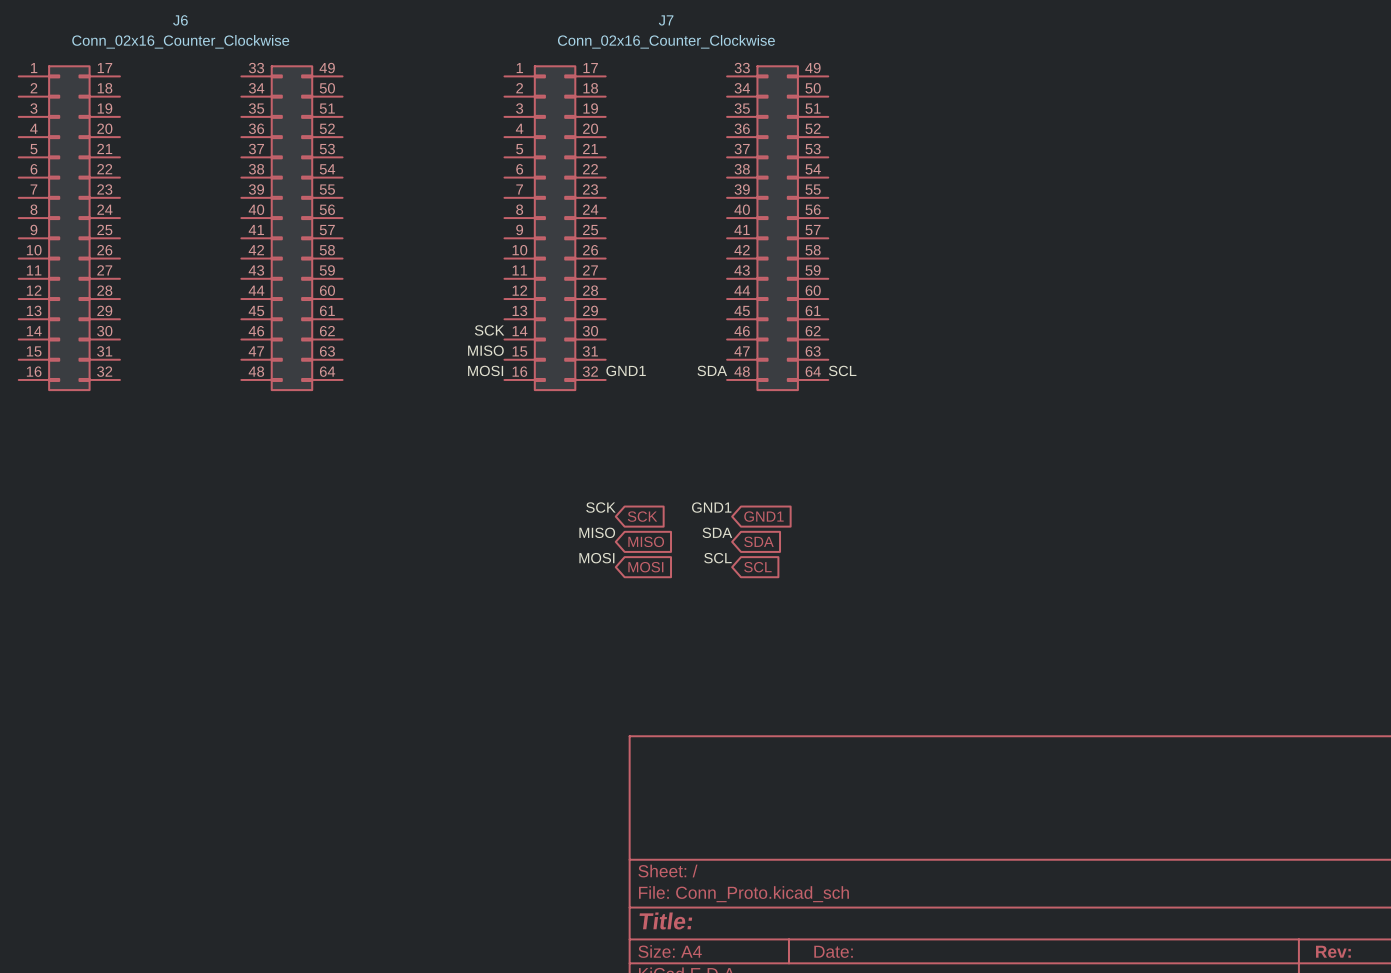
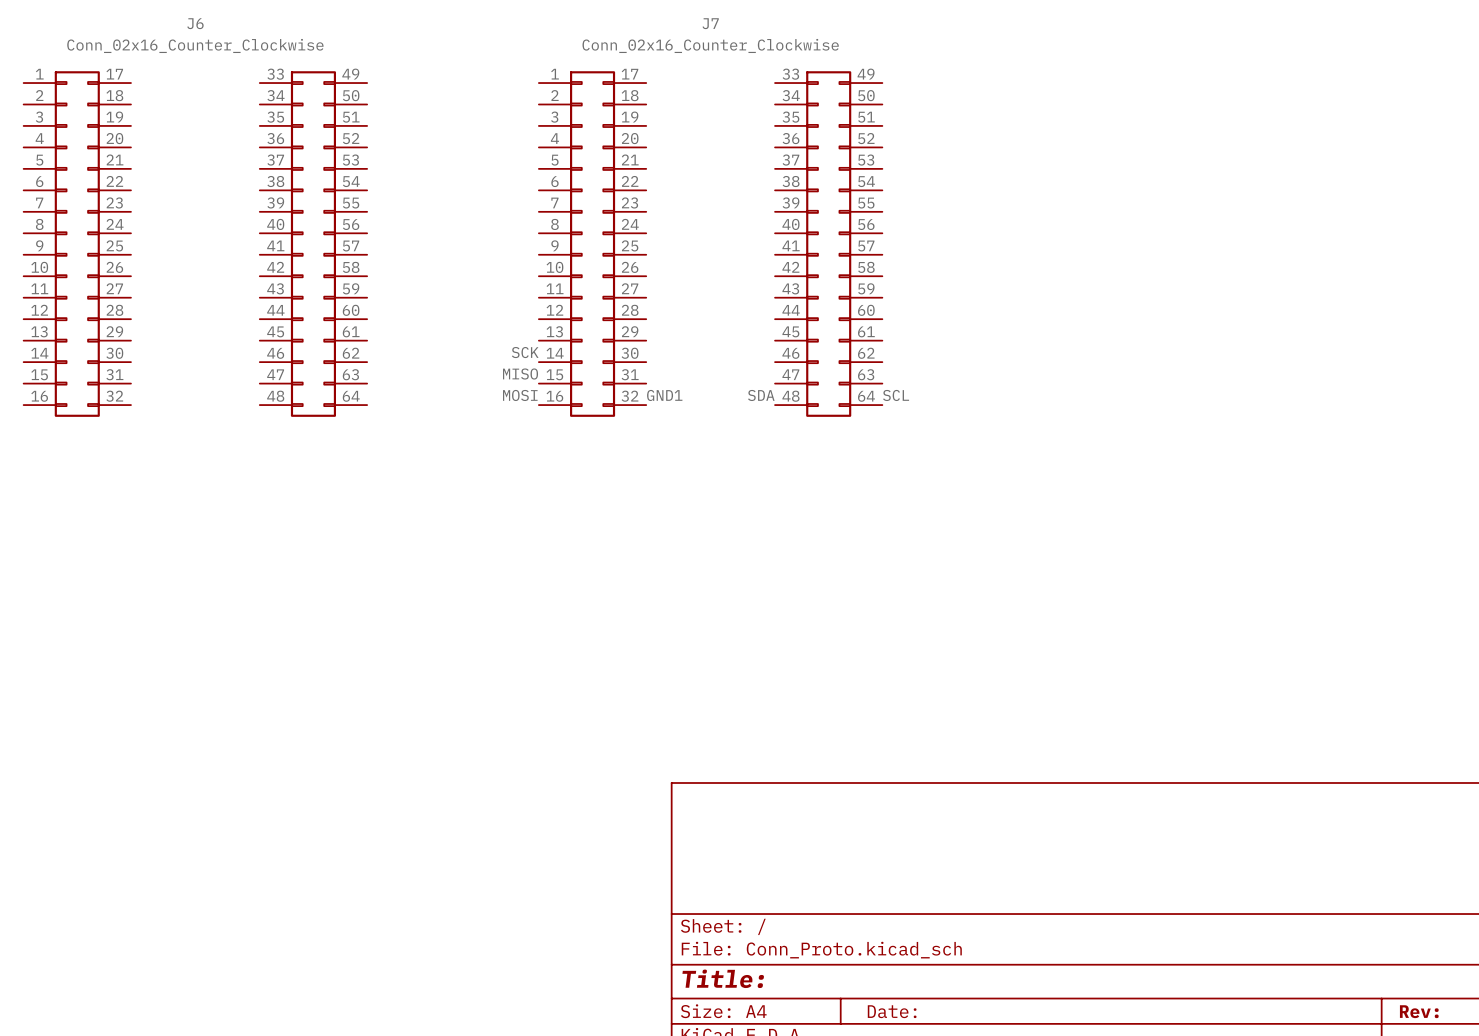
label: SCK (600, 507) -> none
label: GND1 (711, 507) -> none
global label: SCK (642, 516) -> none
global label: GND1 (763, 516) -> none
label: MISO (597, 532) -> none
label: SDA (717, 532) -> none
global label: MISO (646, 541) -> none
global label: SDA (758, 541) -> none
label: MOSI (596, 558) -> none
label: SCL (717, 558) -> none
global label: MOSI (645, 567) -> none
global label: SCL (757, 567) -> none

